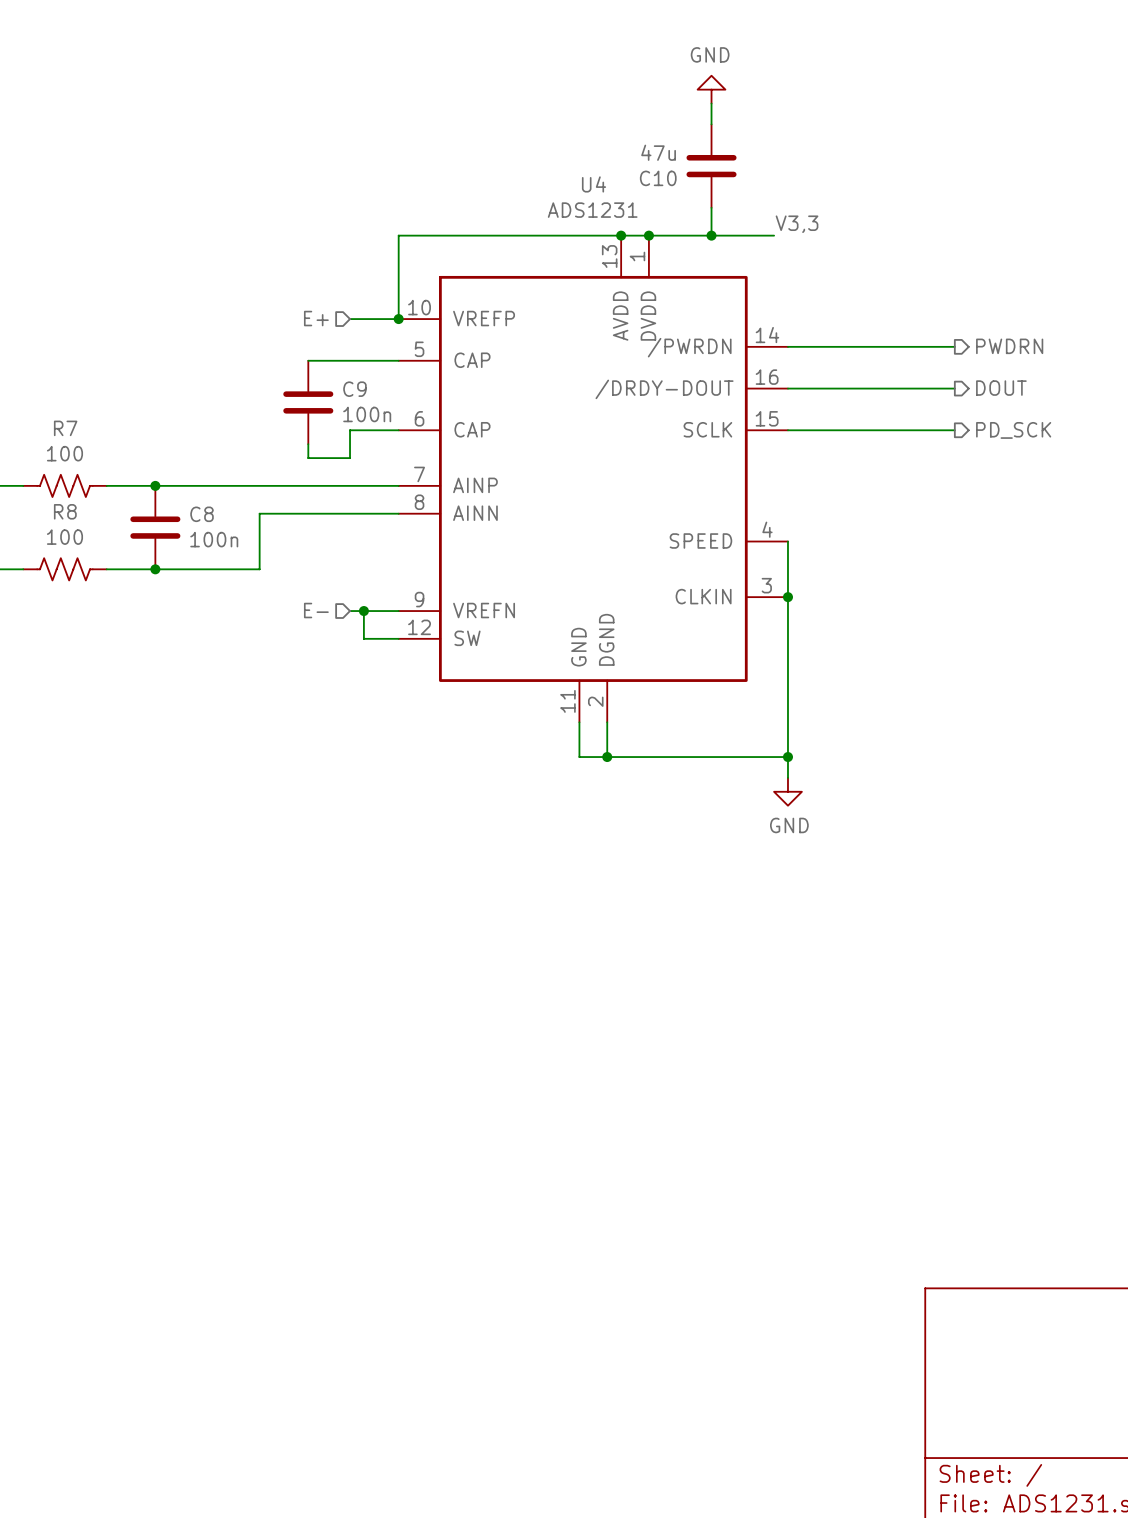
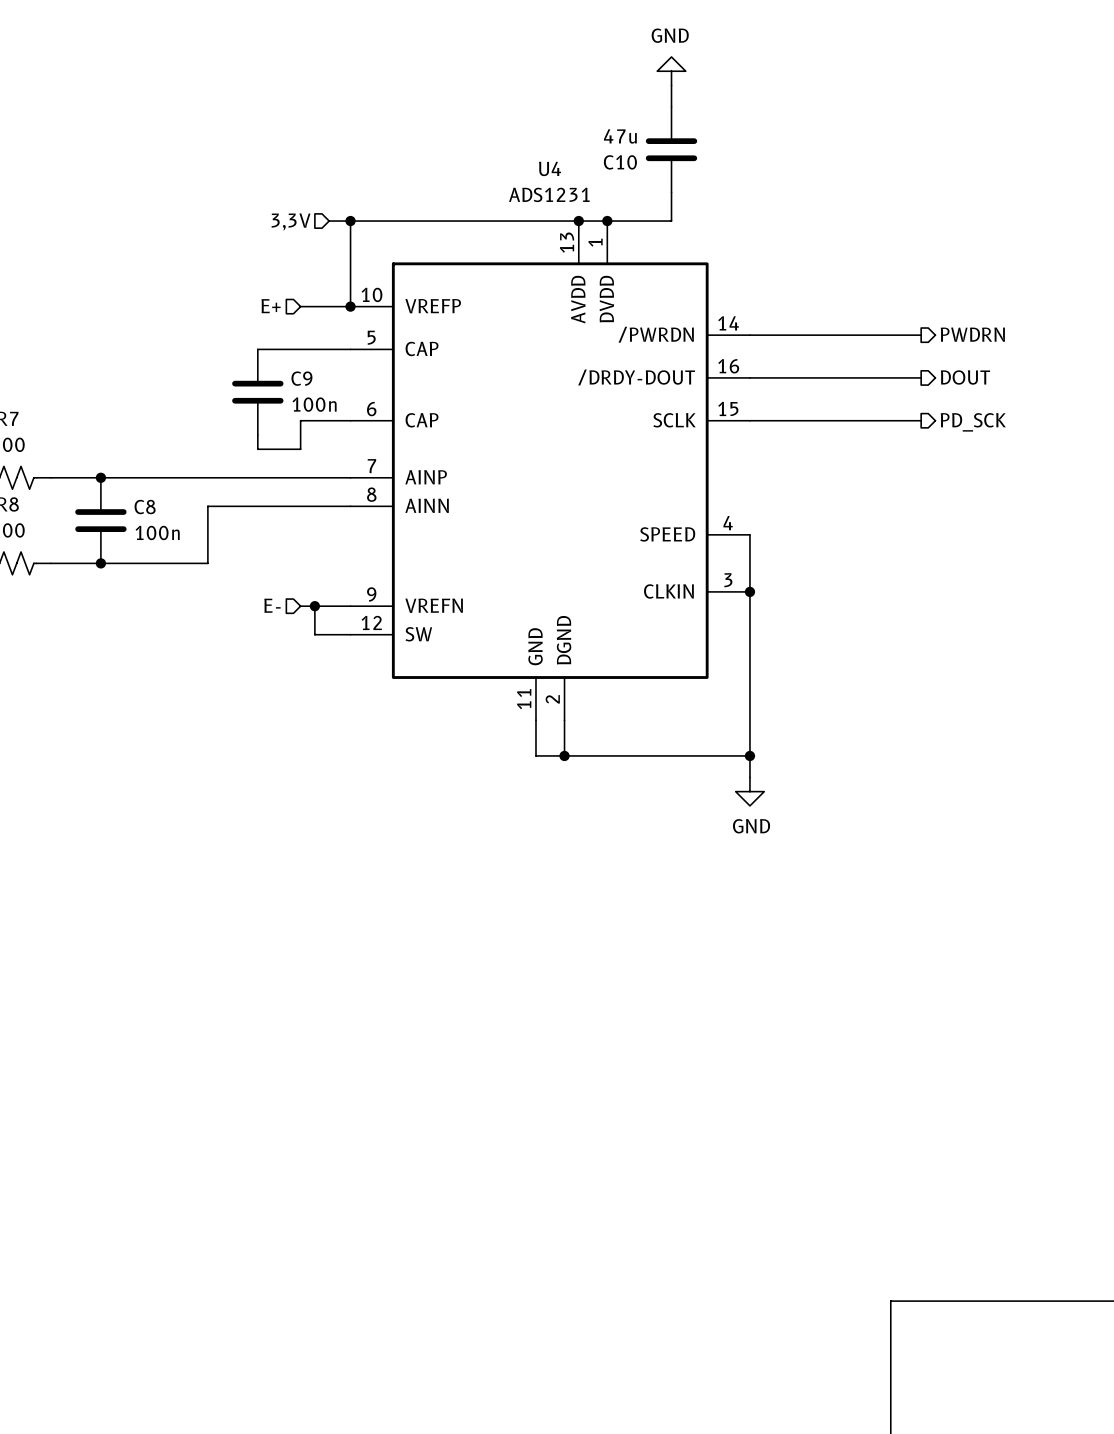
label: V3,3 (797, 224) -> none
wire: none -> (329, 221) (350, 221)
junction: none -> (350, 221)
wire: (711, 235) (774, 235) -> none
junction: (711, 235) -> none
hierarchical label: none -> 3,3V (291, 221)

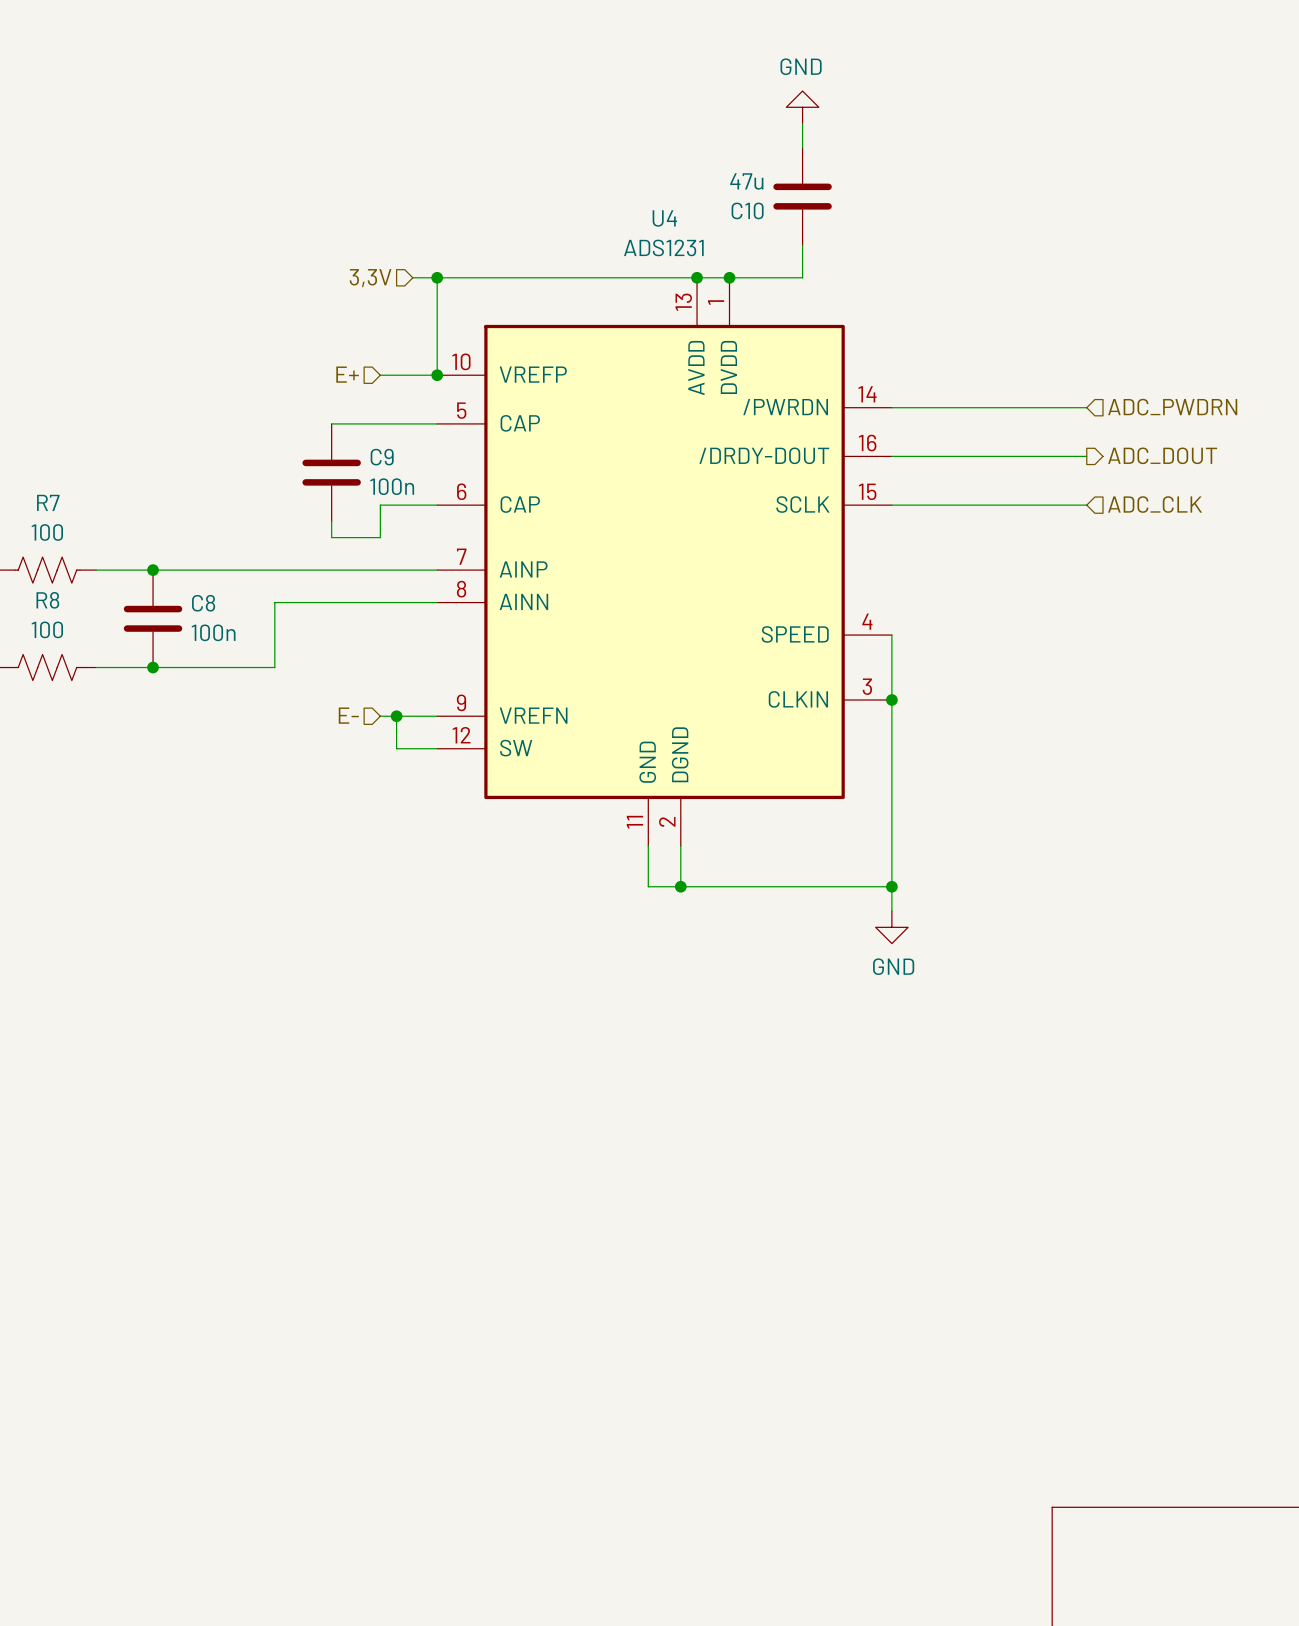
hierarchical label shape: output (972, 334) -> input (1172, 407)
hierarchical label: PWDRN (972, 334) -> ADC_PWDRN (1172, 407)
hierarchical label: DOUT (965, 377) -> ADC_DOUT (1162, 455)
hierarchical label shape: output (973, 422) -> input (1155, 504)
hierarchical label: PD_SCK (973, 422) -> ADC_CLK (1155, 504)

